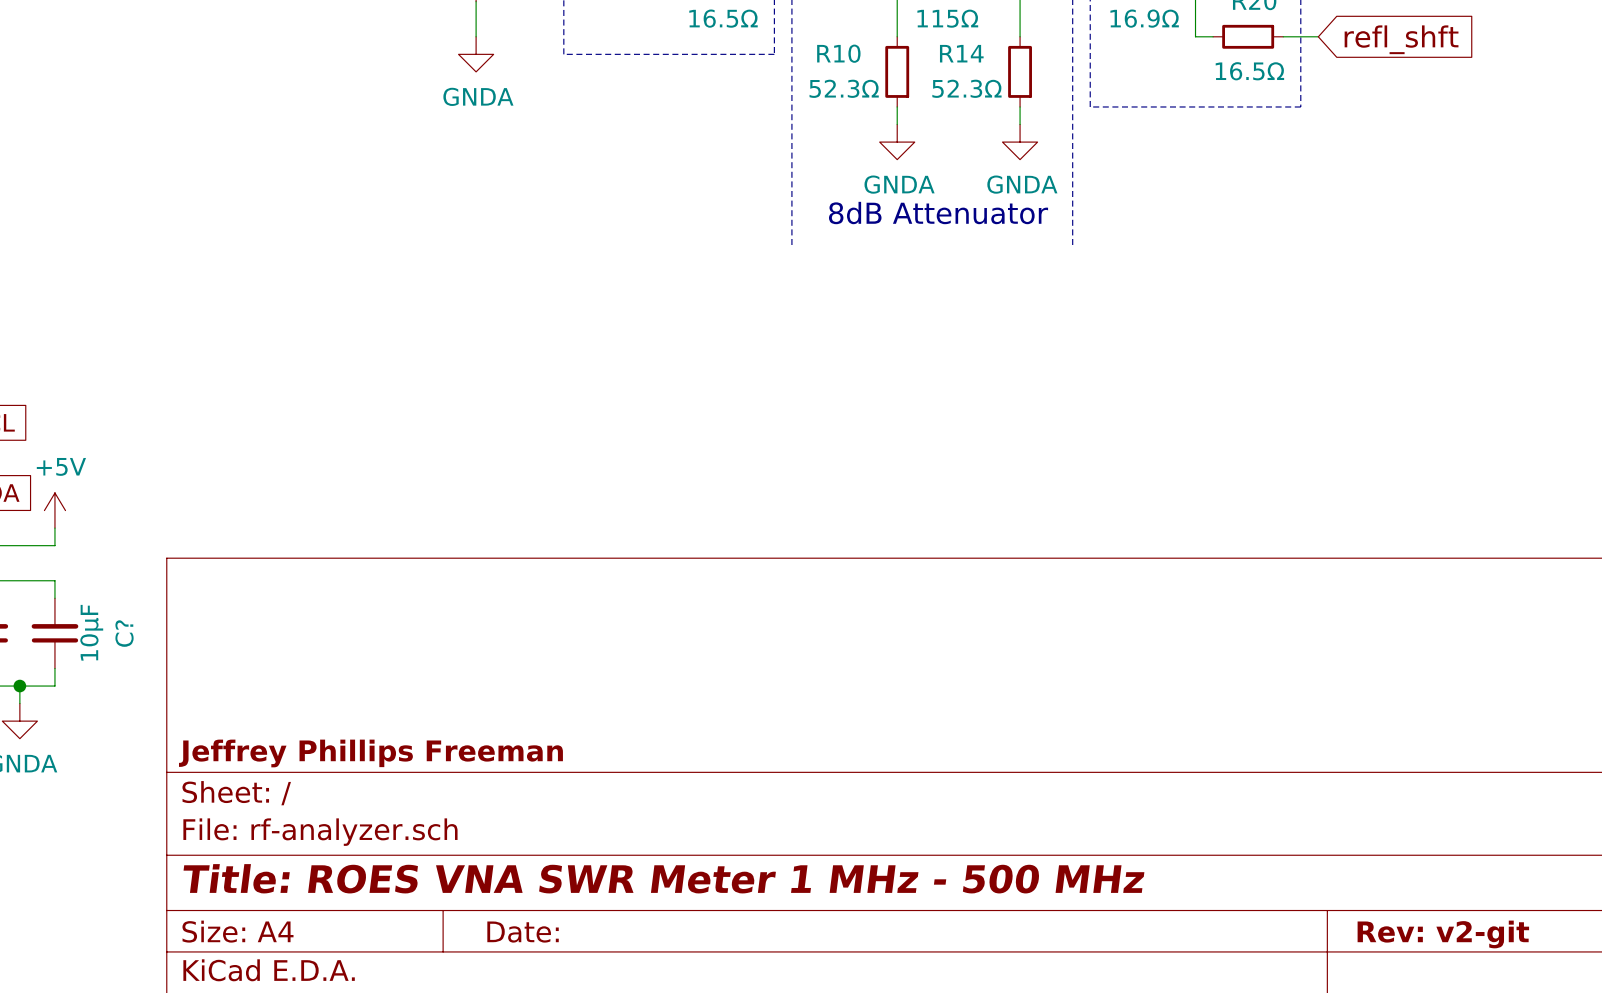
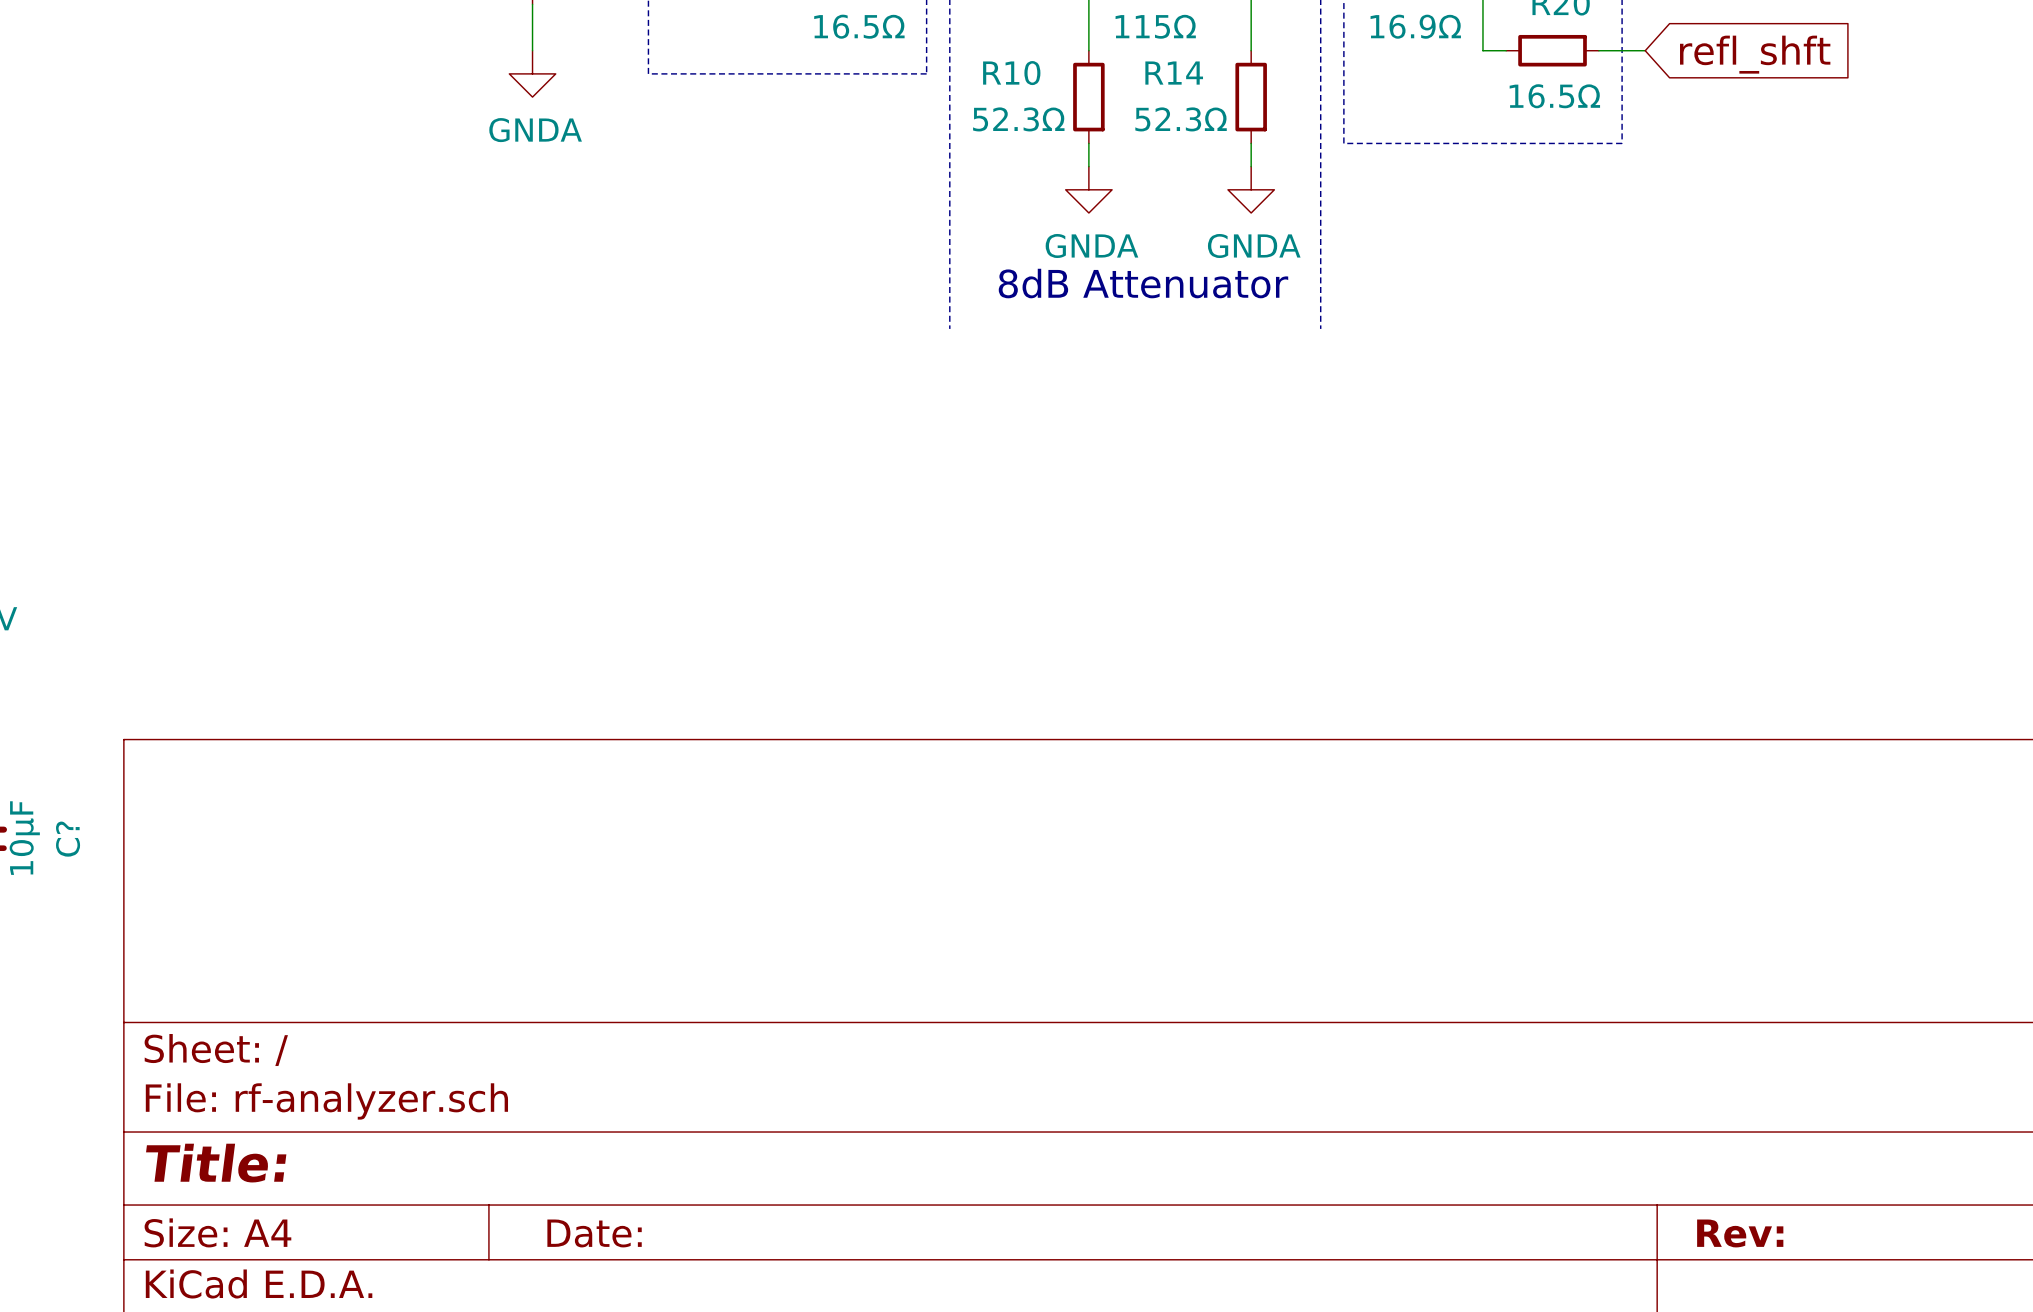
title block: Jeffrey Phillips Freeman (370, 753) -> none
title block: Title: ROES VNA SWR Meter 1 MHz - 500 MHz (663, 878) -> Title: (216, 1163)
title block: Rev: v2-git (1443, 934) -> Rev: (1740, 1233)

